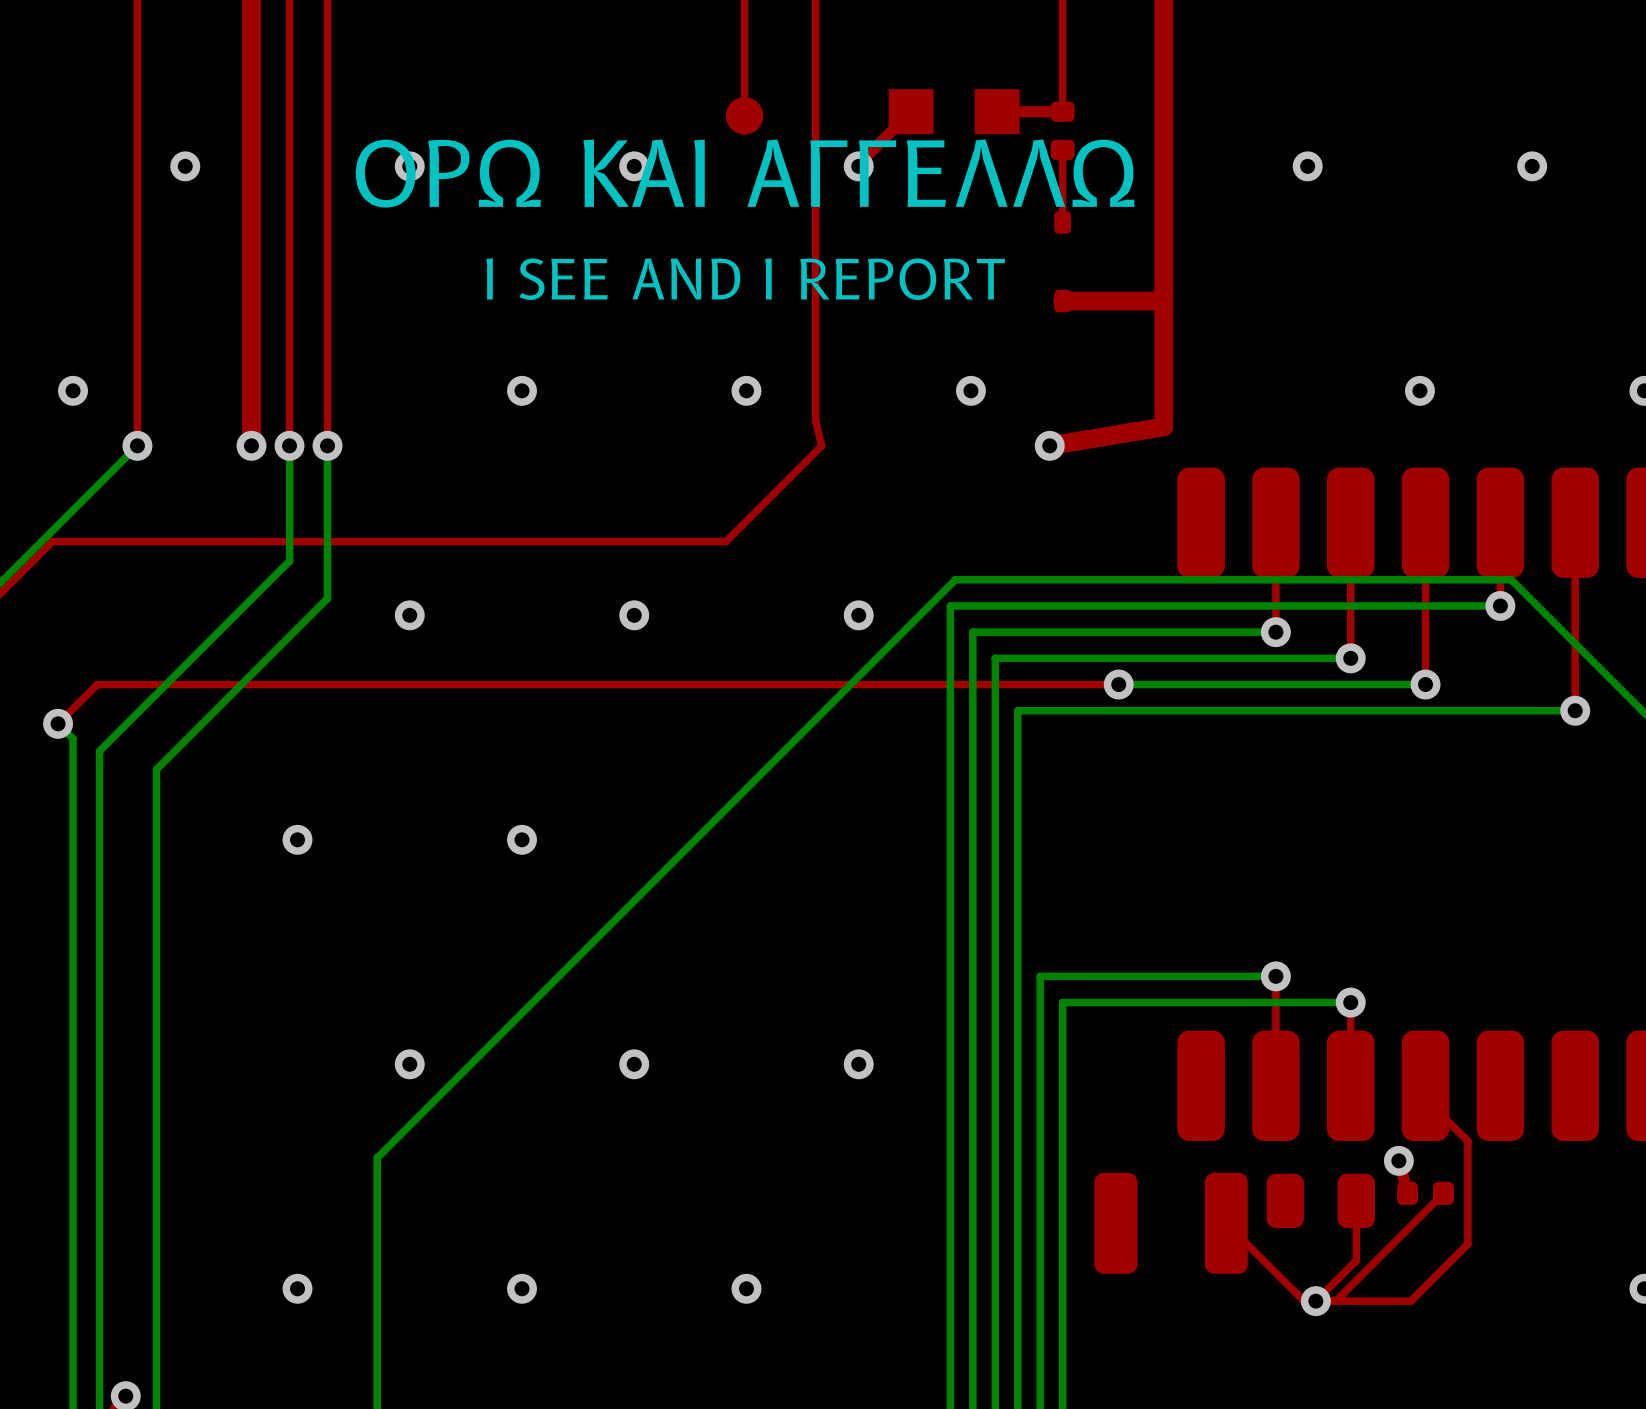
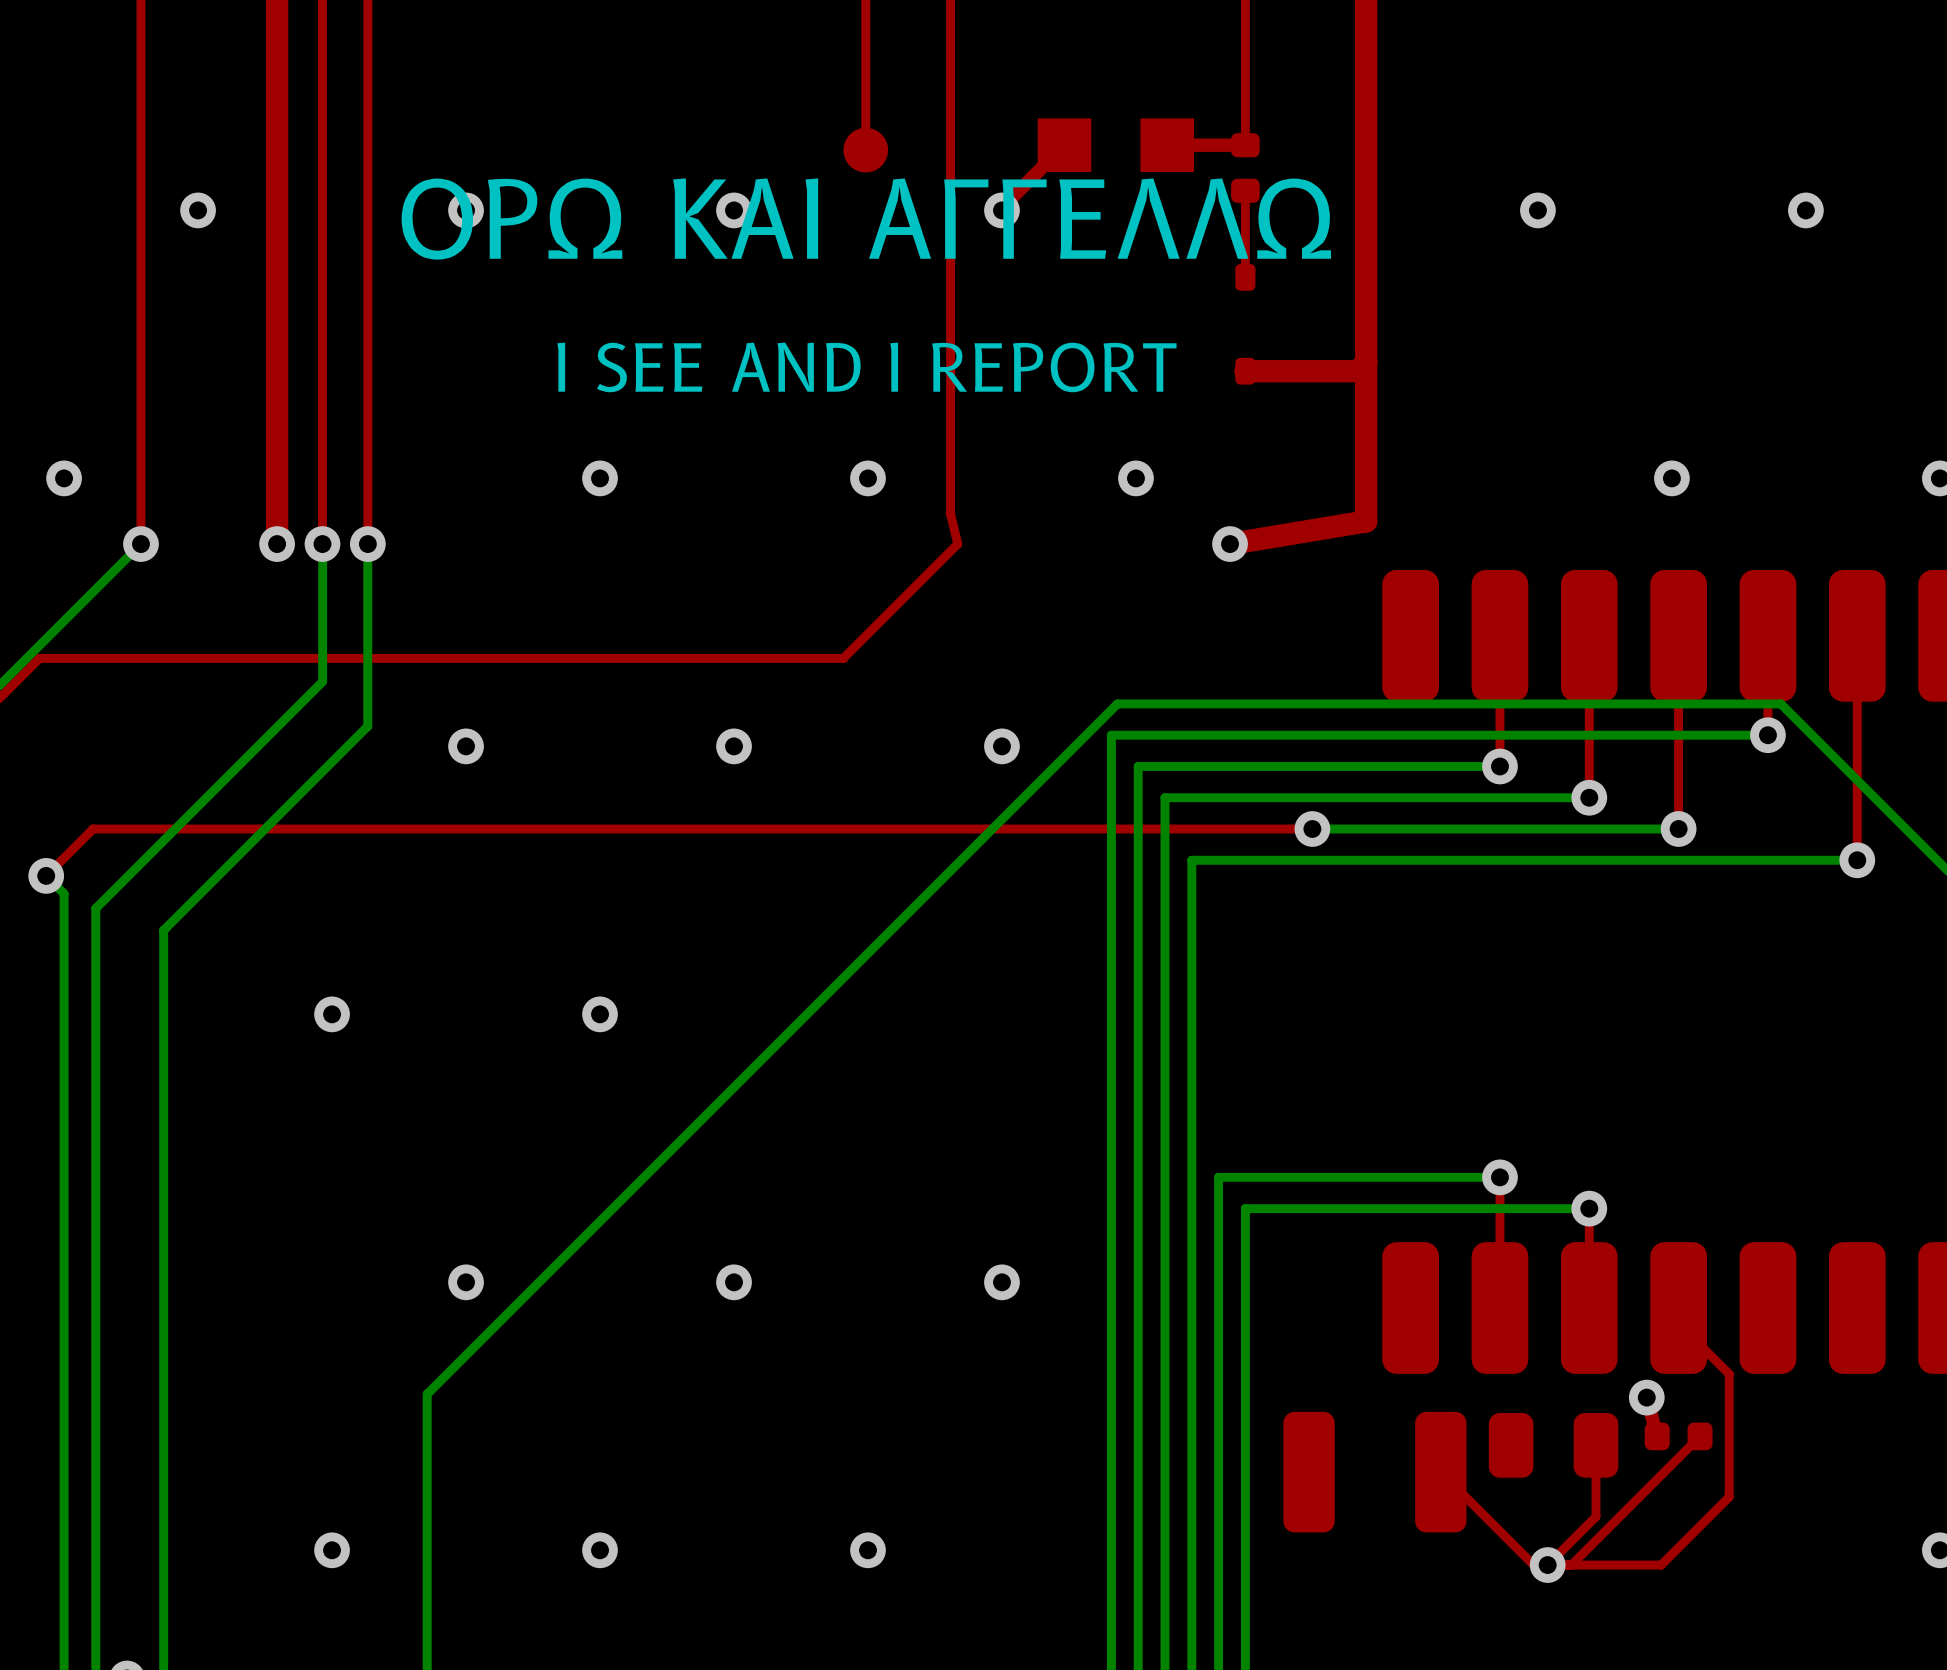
text position: I SEE AND I REPORT (745, 279) -> I SEE AND I REPORT (866, 367)

